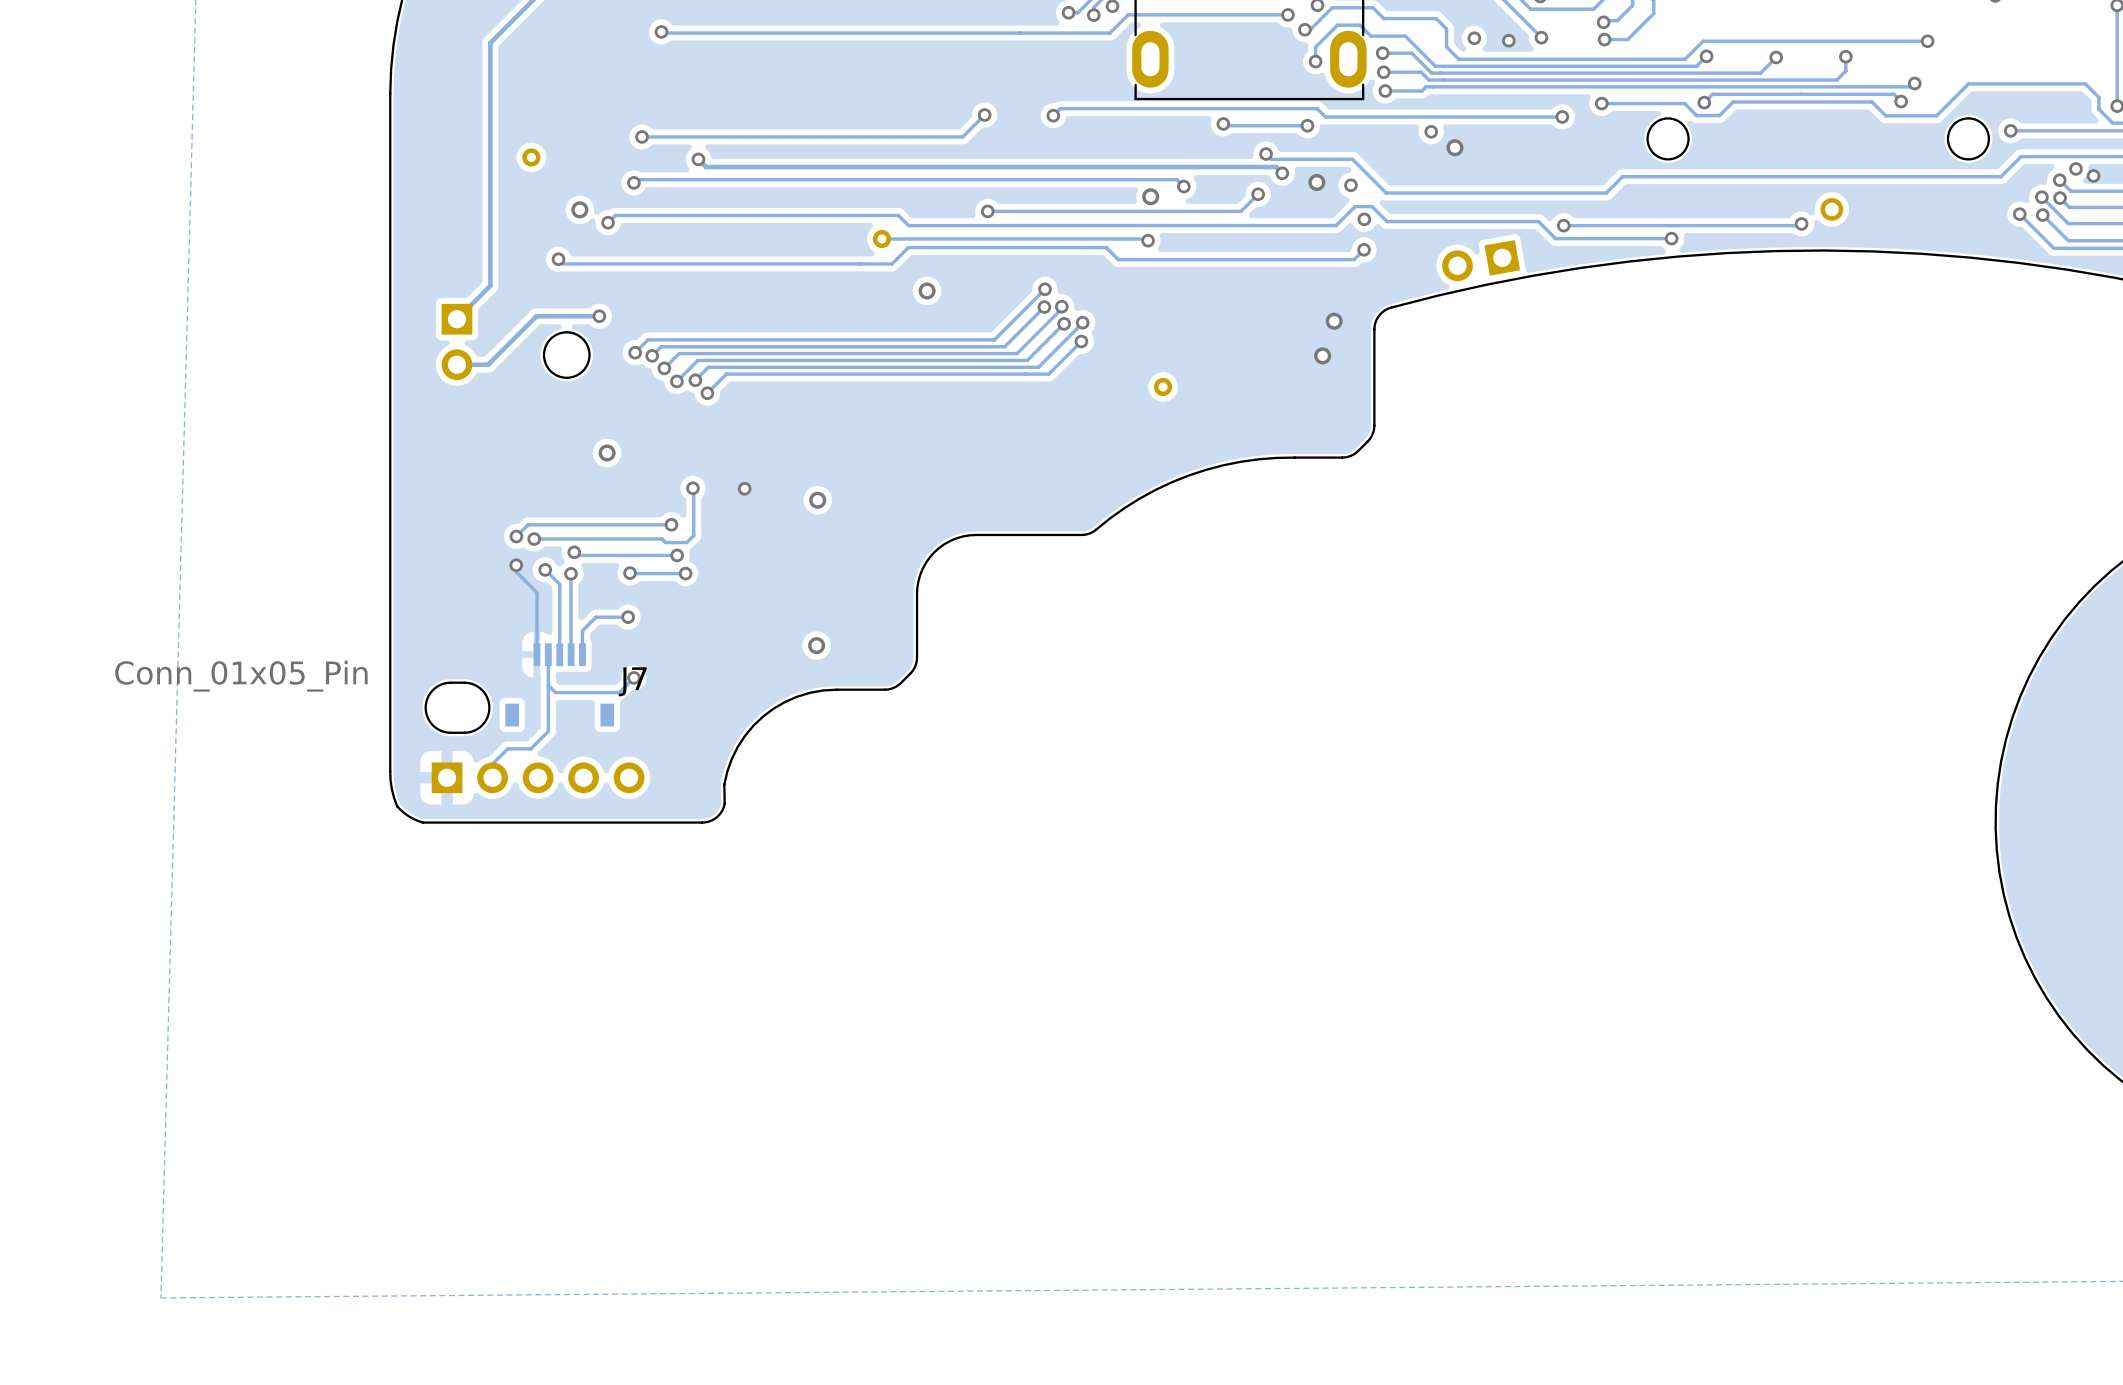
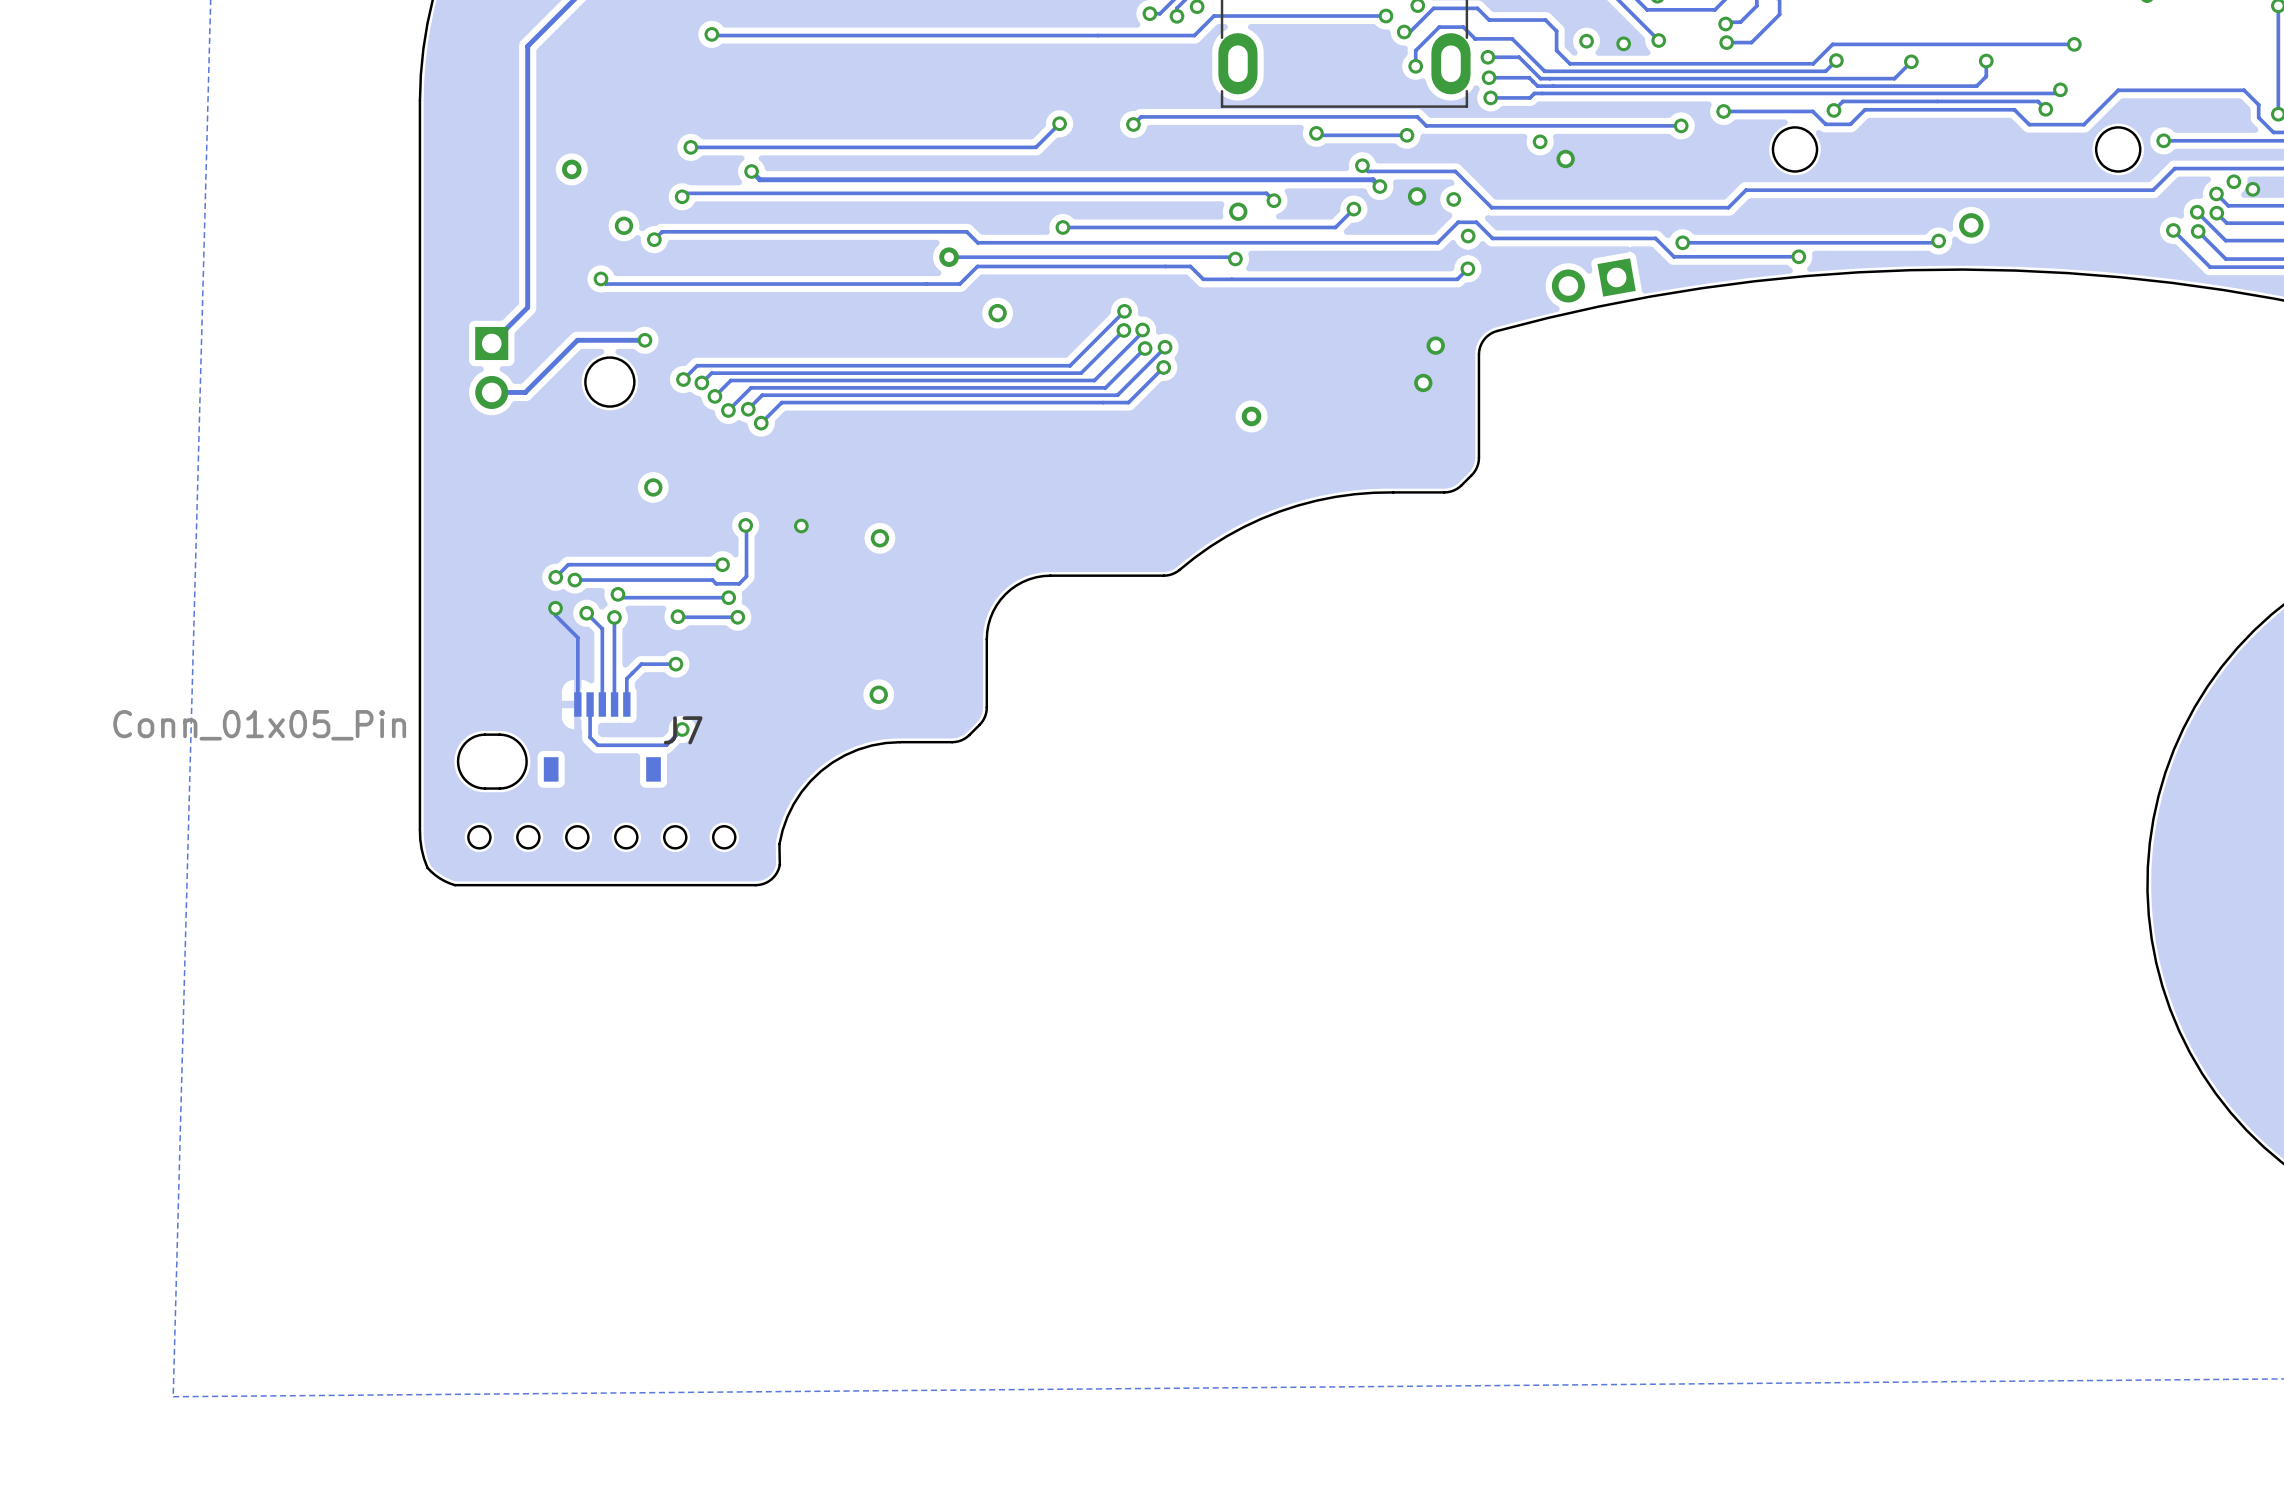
track: (548, 685) (548, 731) (530, 748) (507, 748) (492, 764) (492, 777) -> none
round board edge: none -> [467, 825, 492, 850]
round board edge: none -> [516, 825, 541, 850]
round board edge: none -> [565, 825, 590, 850]
round board edge: none -> [614, 825, 639, 850]
round board edge: none -> [663, 825, 688, 850]
round board edge: none -> [712, 825, 737, 850]
part: (538, 777) -> none

